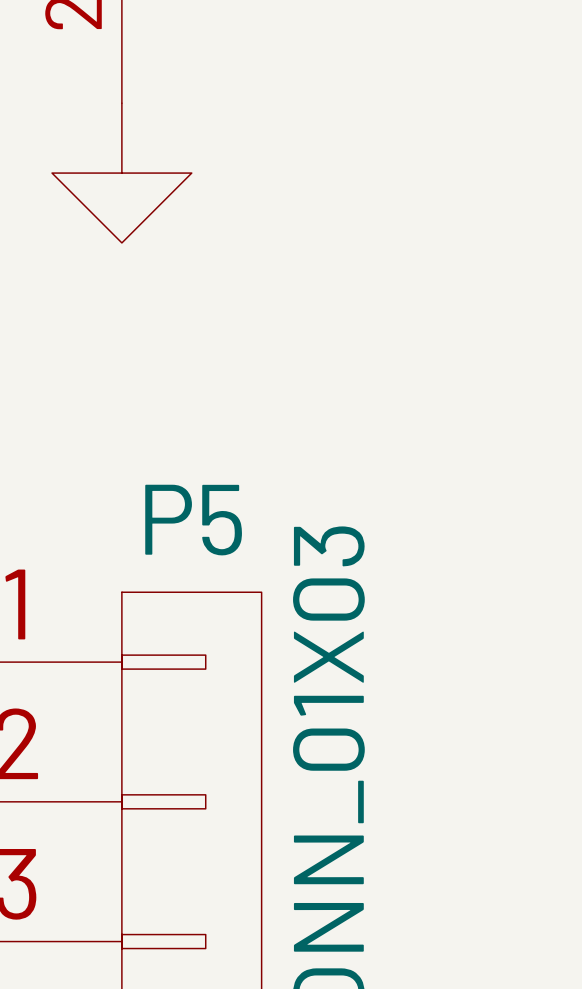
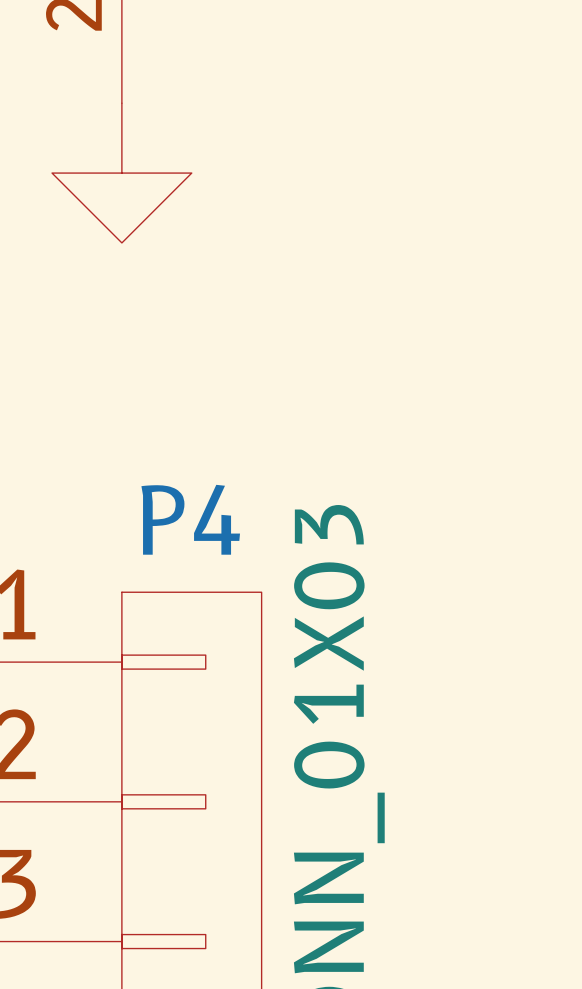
P5 name: P5 (193, 520) -> P4 (190, 519)

